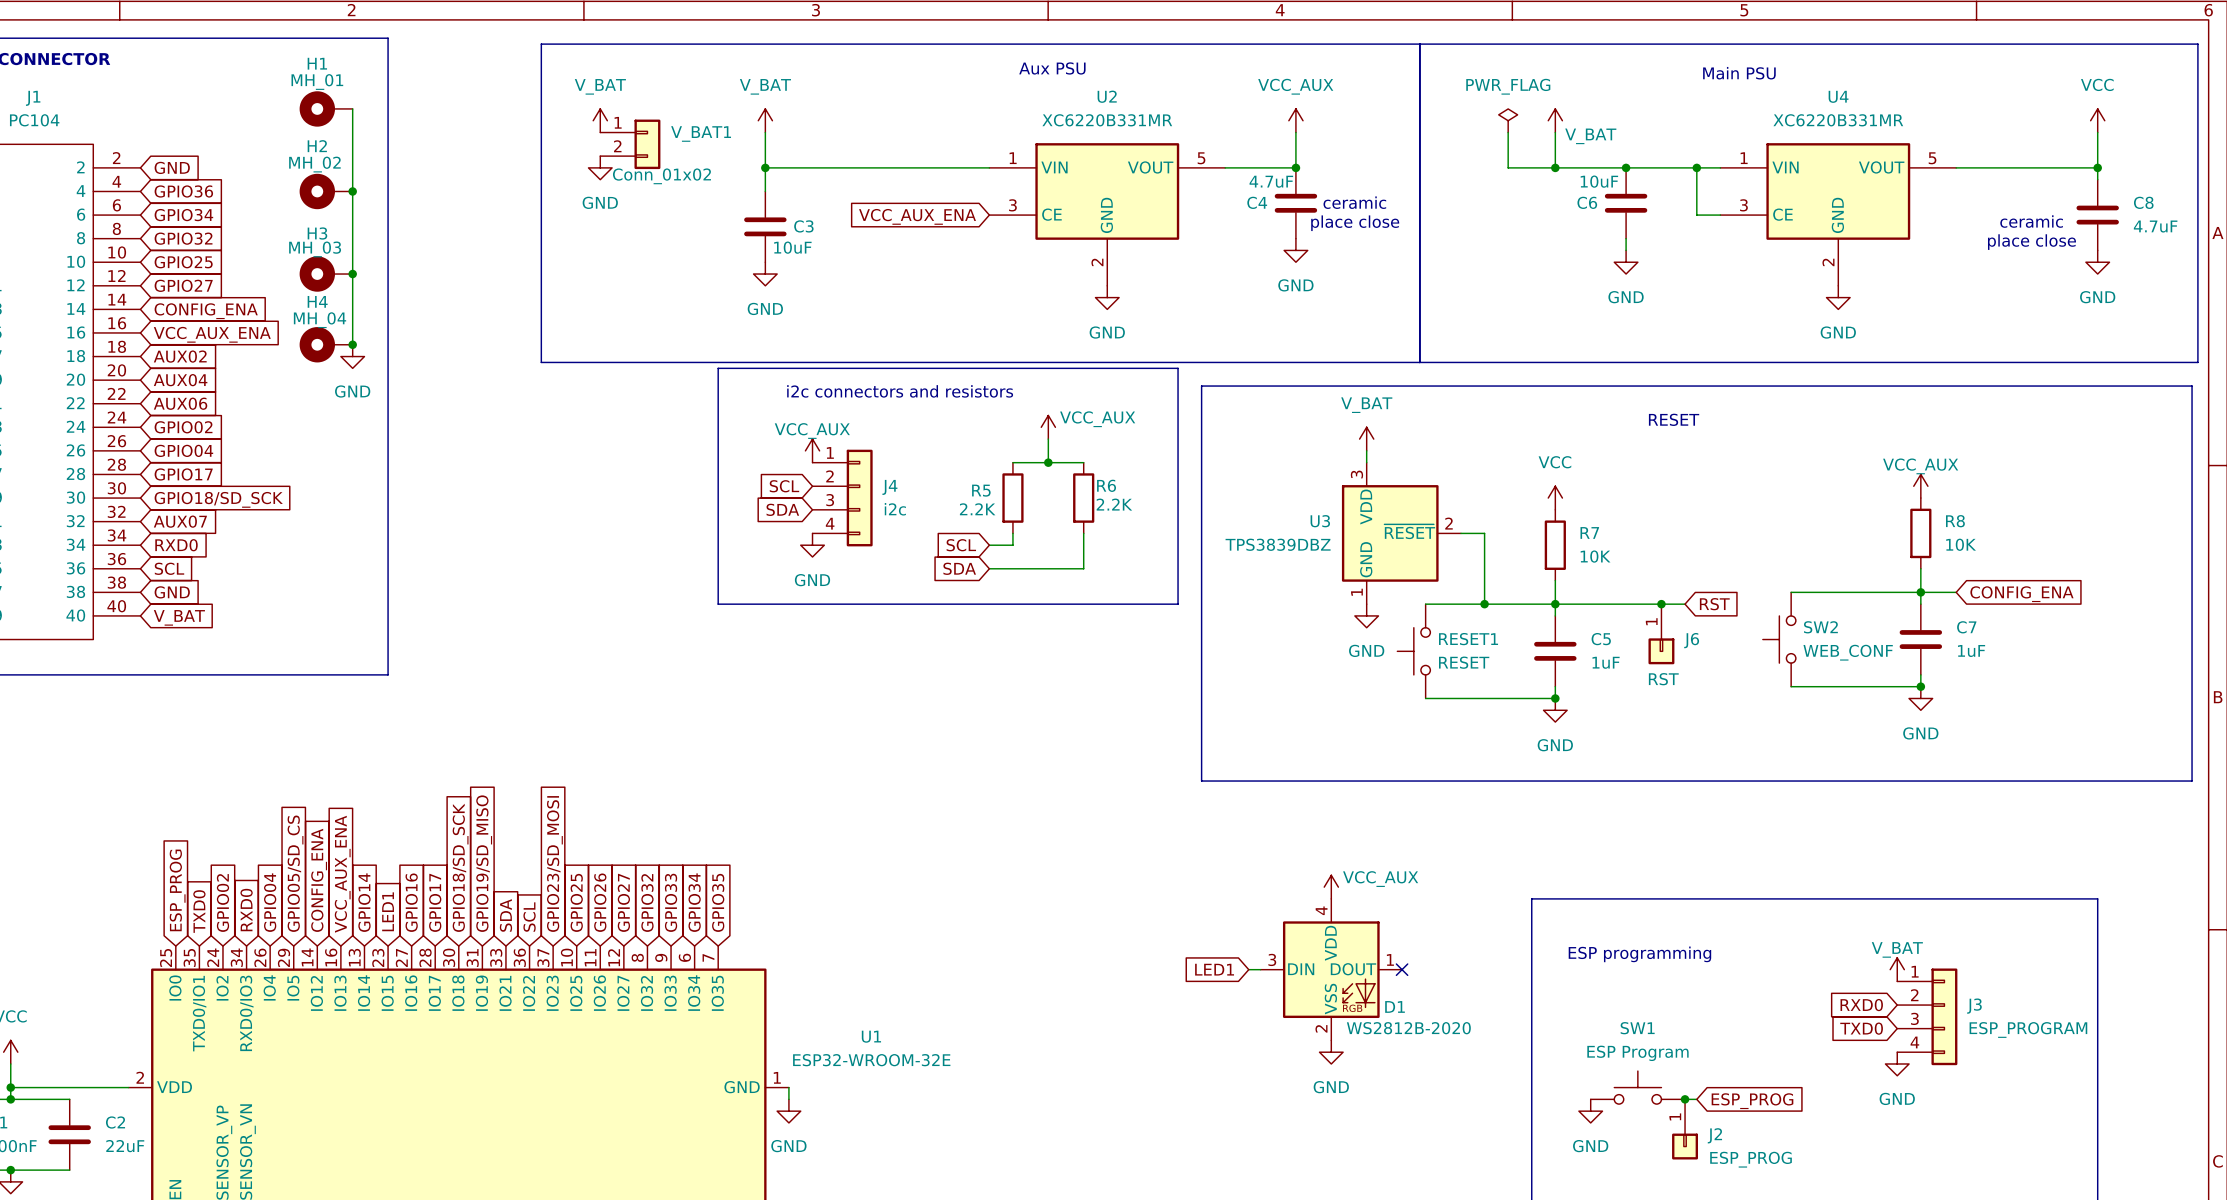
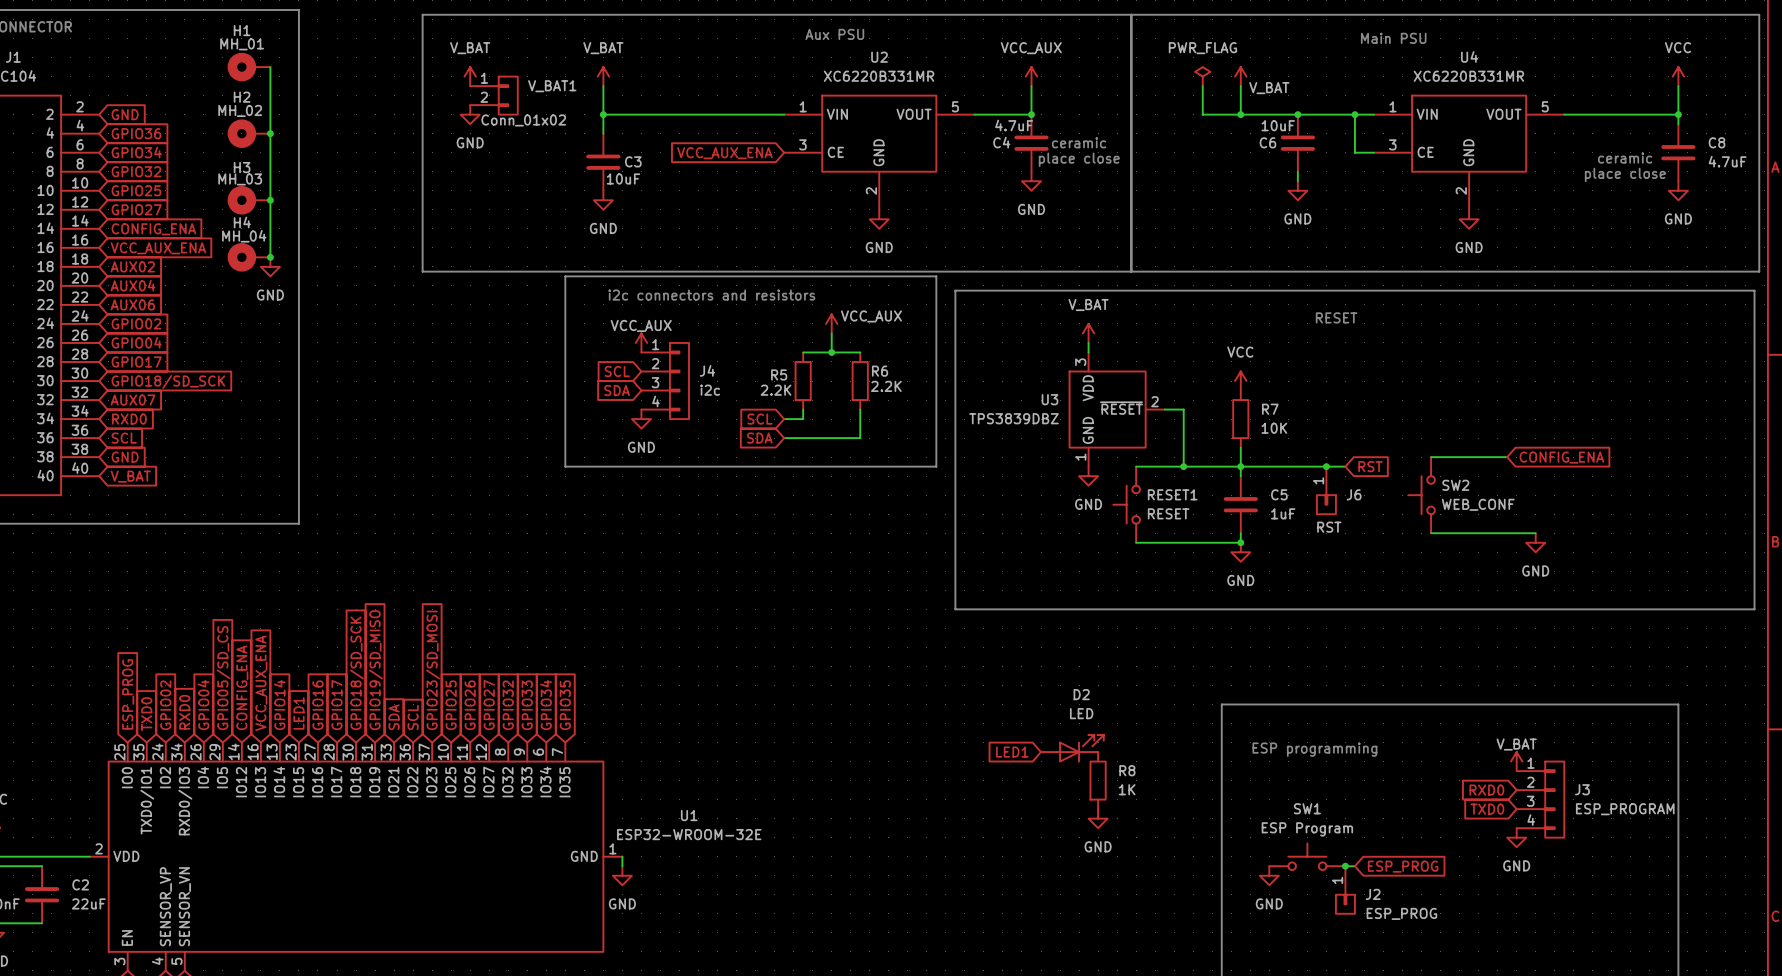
power symbol: VCC_AUX (1920, 486) -> none
R8 position: (1920, 533) -> (1098, 780)
R8 value: 10K (1961, 544) -> 1K (1127, 789)
wire: (1920, 568) (1920, 604) -> none
wire: (1885, 592) (1956, 592) -> none
junction: (1920, 592) -> none
global label position: CONFIG_ENA (2021, 594) -> CONFIG_ENA (1561, 457)
C7: 1uF (1920, 639) -> none
wire: (1920, 674) (1920, 686) -> none
junction: (1920, 686) -> none
power symbol: VCC_AUX (1331, 887) -> none
D2: none -> LED (1072, 748)
global label position: LED1 (1214, 969) -> LED1 (1012, 752)
D1: WS2812B-2020 (1331, 969) -> none
no-connect mark: (1402, 969) -> none
power symbol position: GND (1331, 1052) -> GND (1098, 818)

